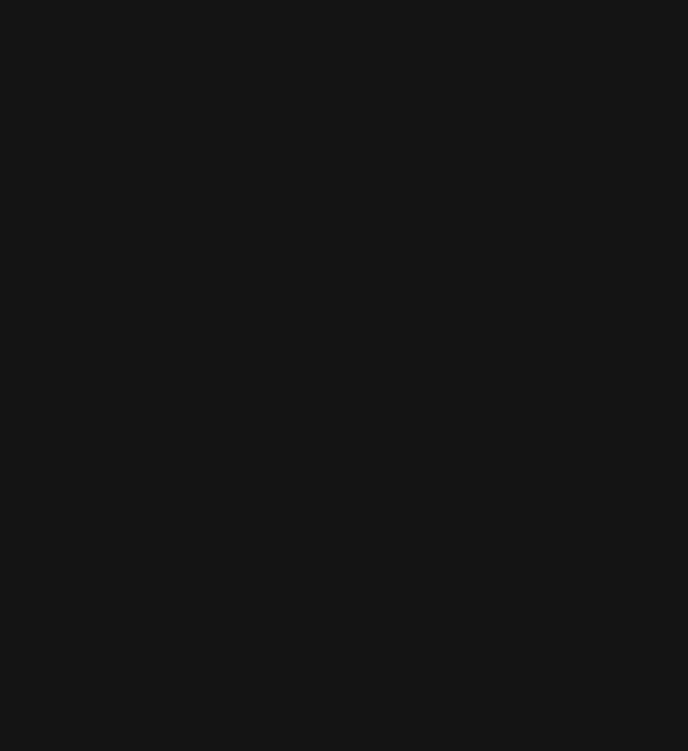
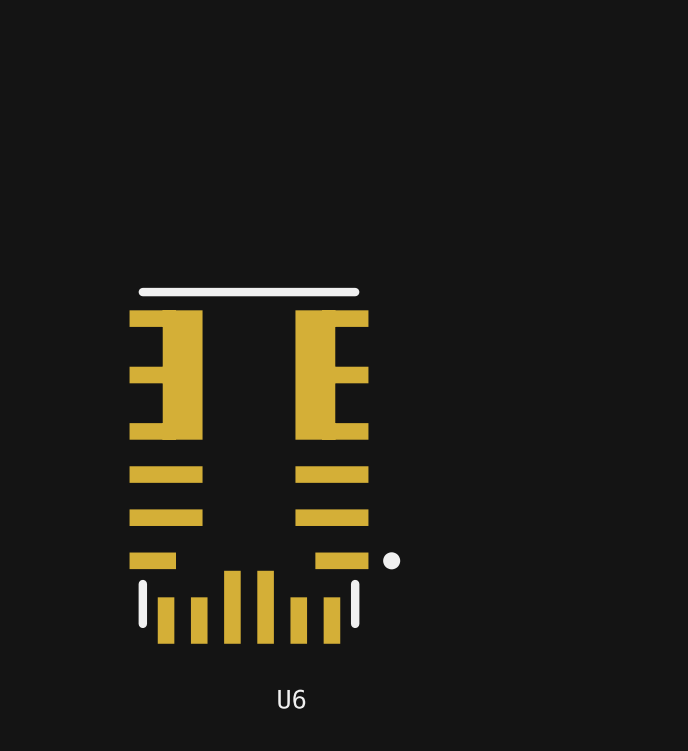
U6: none -> (264, 465)

